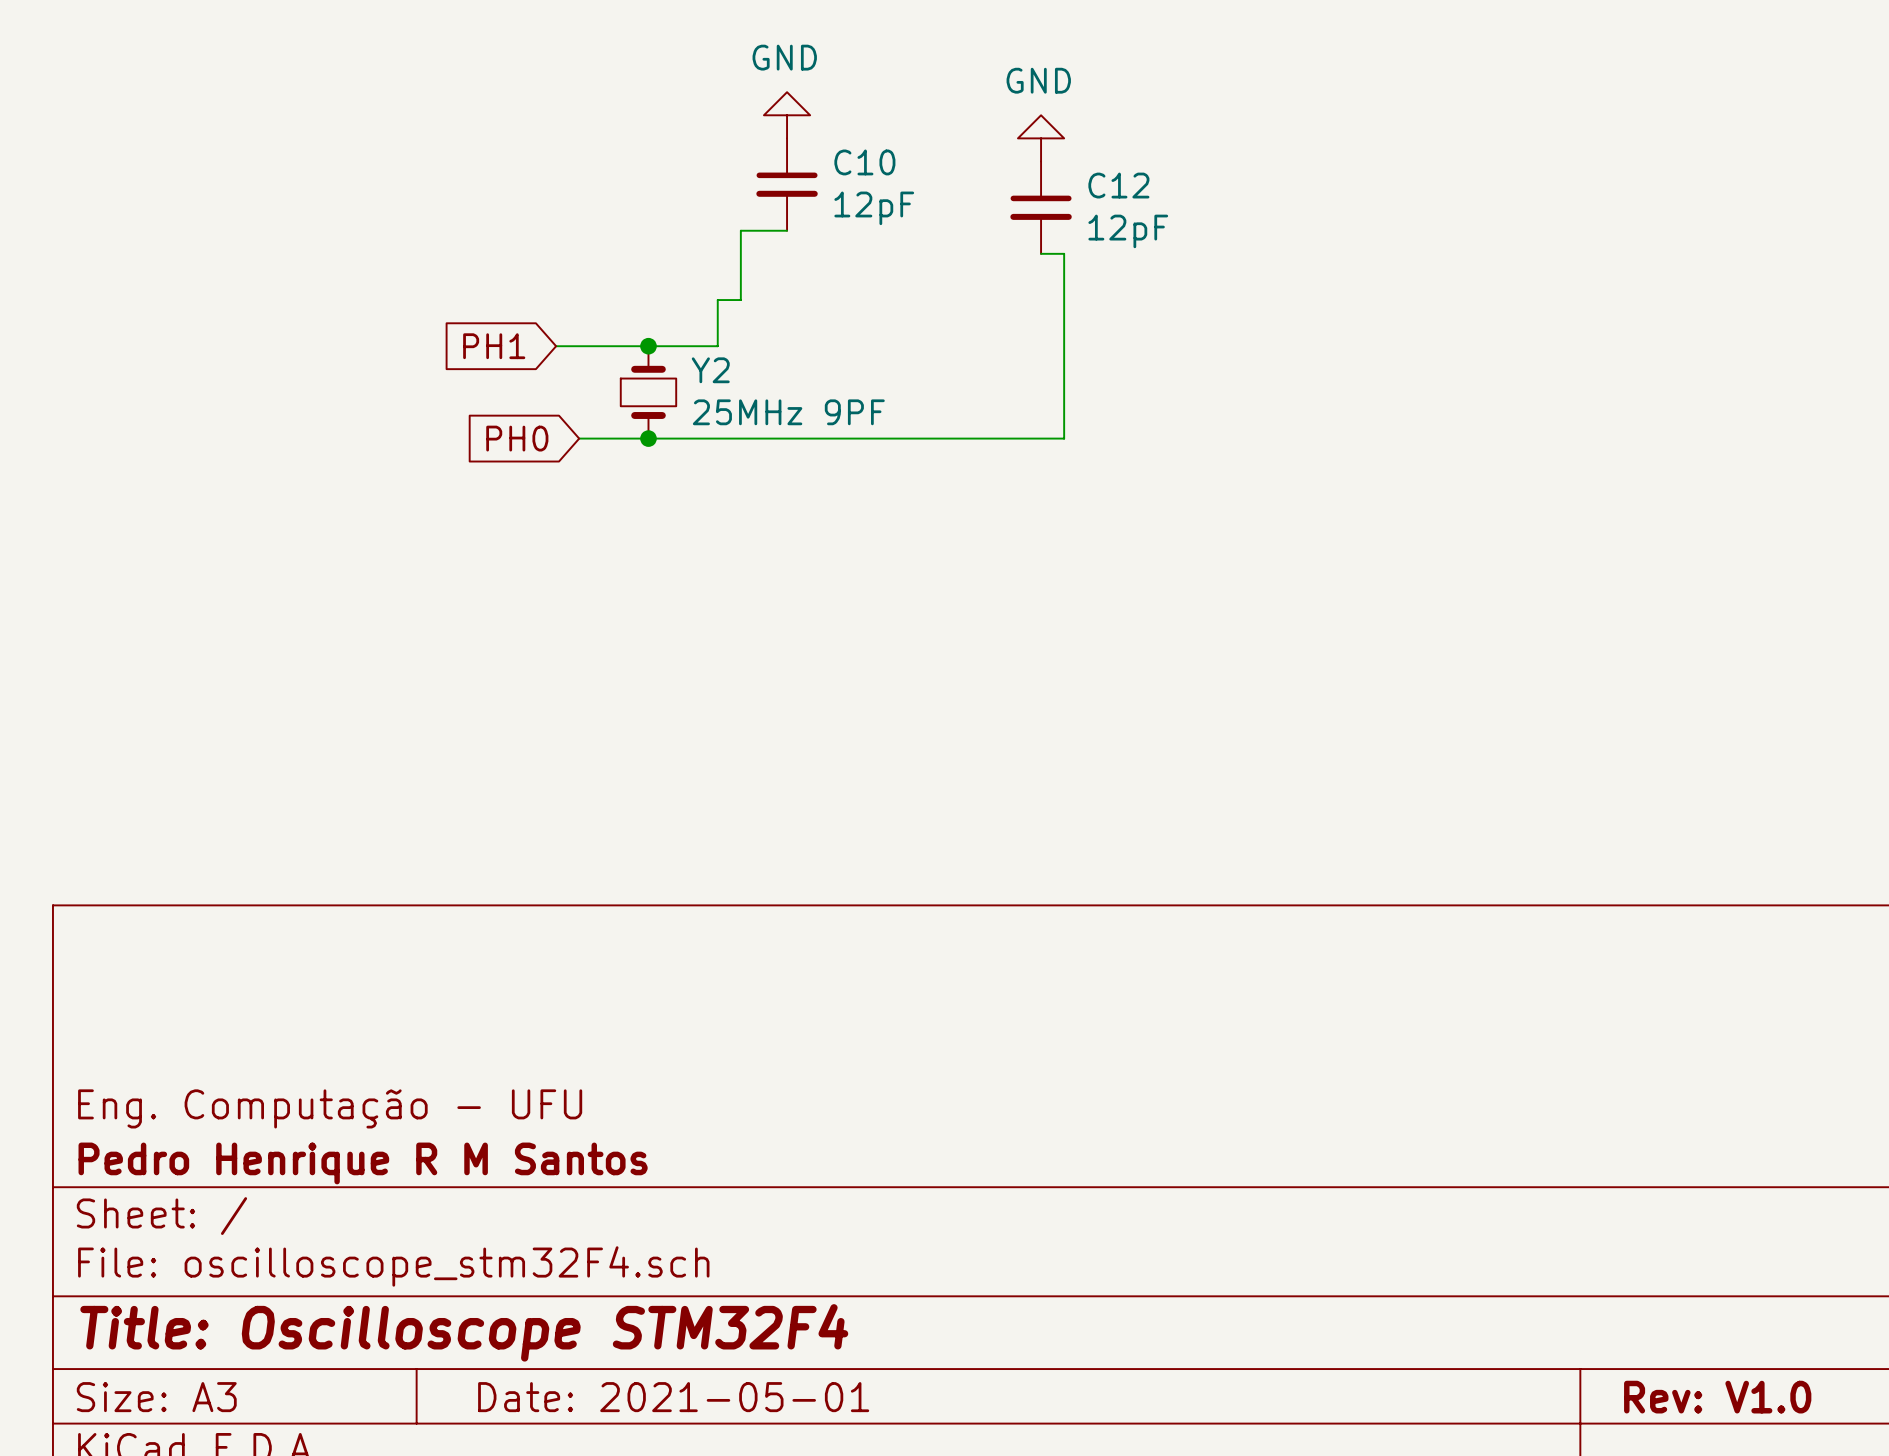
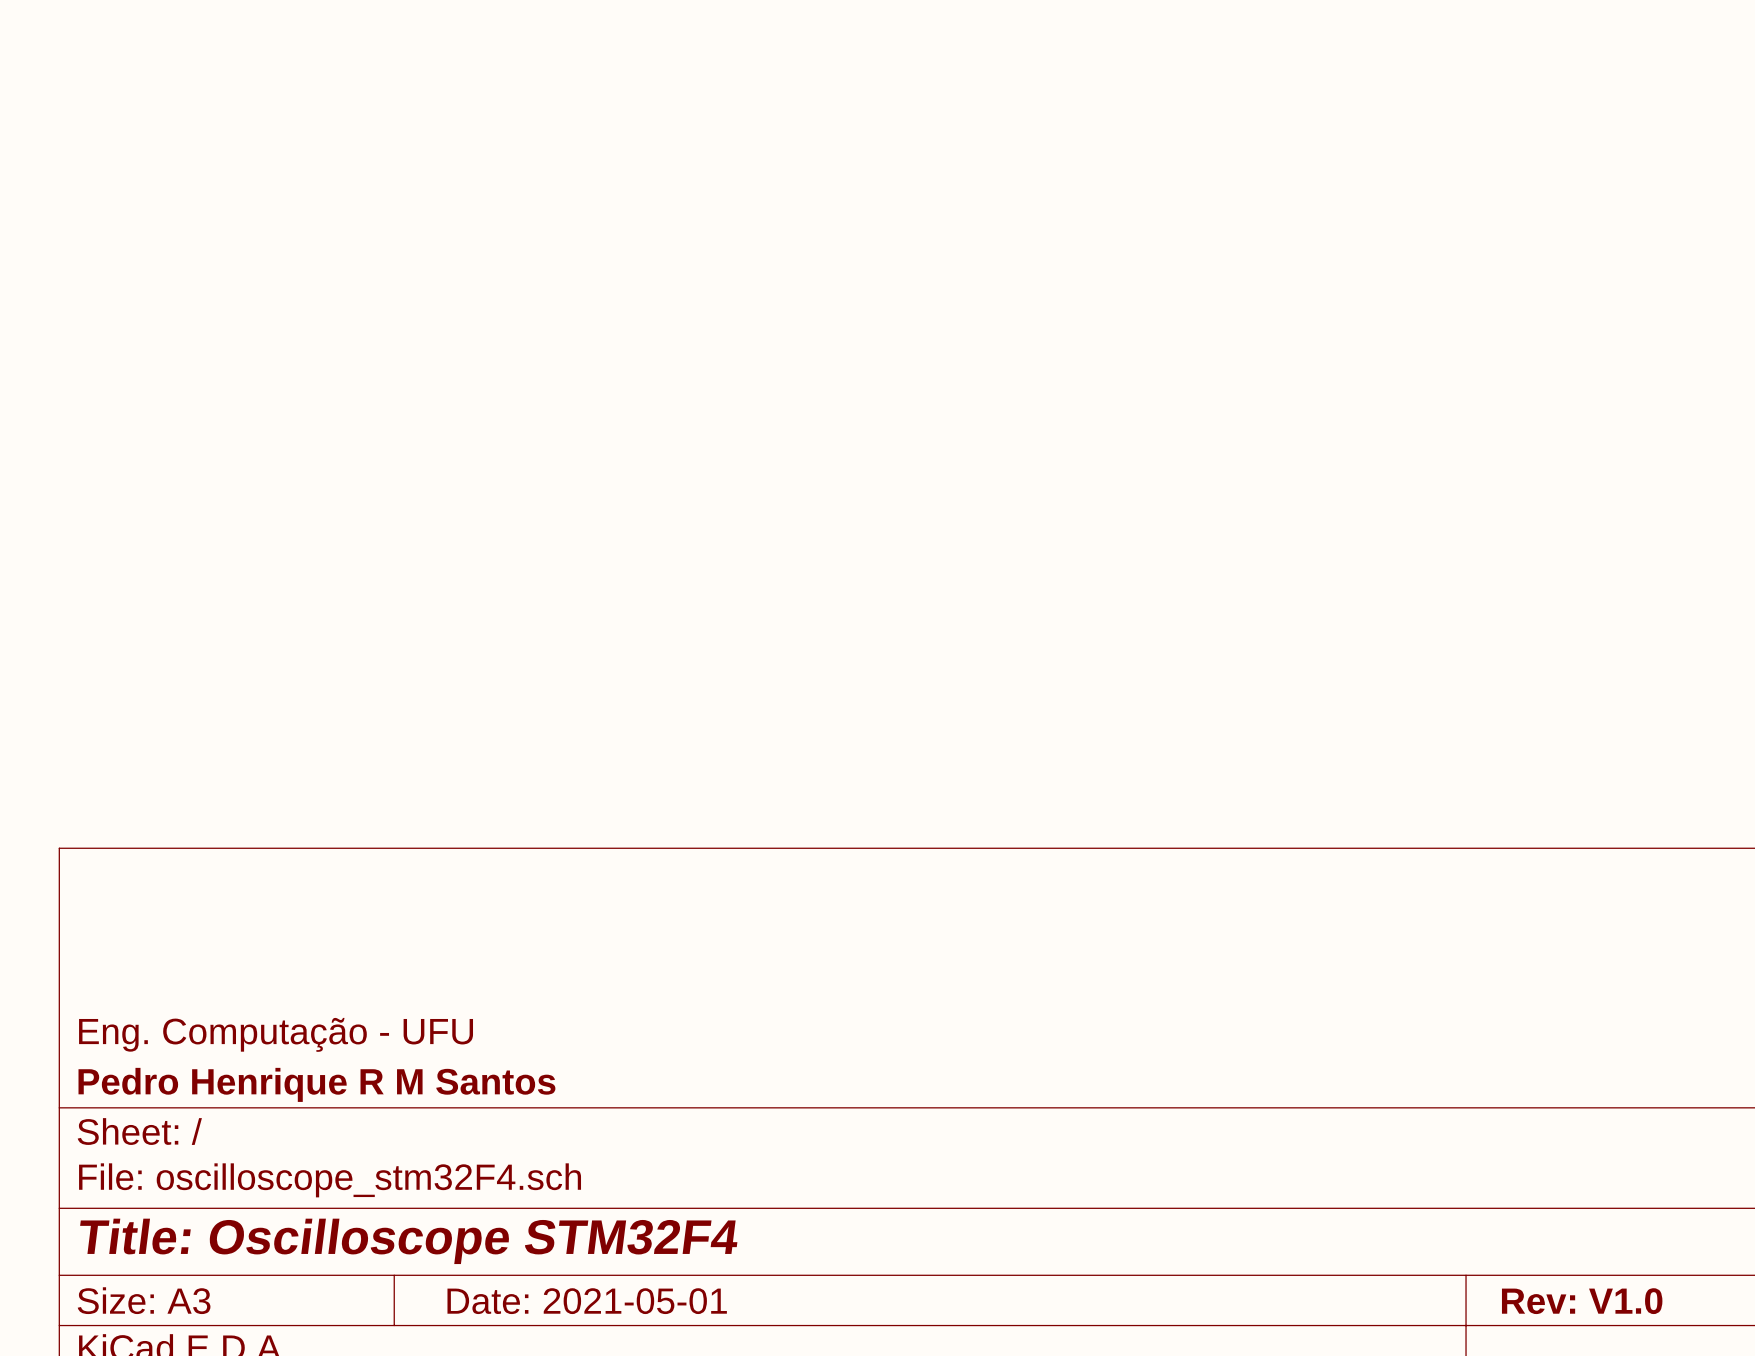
power symbol: GND (787, 115) -> none
power symbol: GND (1041, 138) -> none
C10: 12pF (787, 184) -> none
C12: 12pF (1041, 207) -> none
wire: (787, 230) (740, 230) (740, 300) (717, 300) (717, 346) (556, 346) -> none
wire: (1041, 253) (1064, 253) (1064, 438) (579, 438) -> none
global label: PH1 (494, 346) -> none
junction: (648, 346) -> none
Y2: 25MHz 9PF (648, 392) -> none
global label: PH0 (517, 438) -> none
junction: (648, 438) -> none

